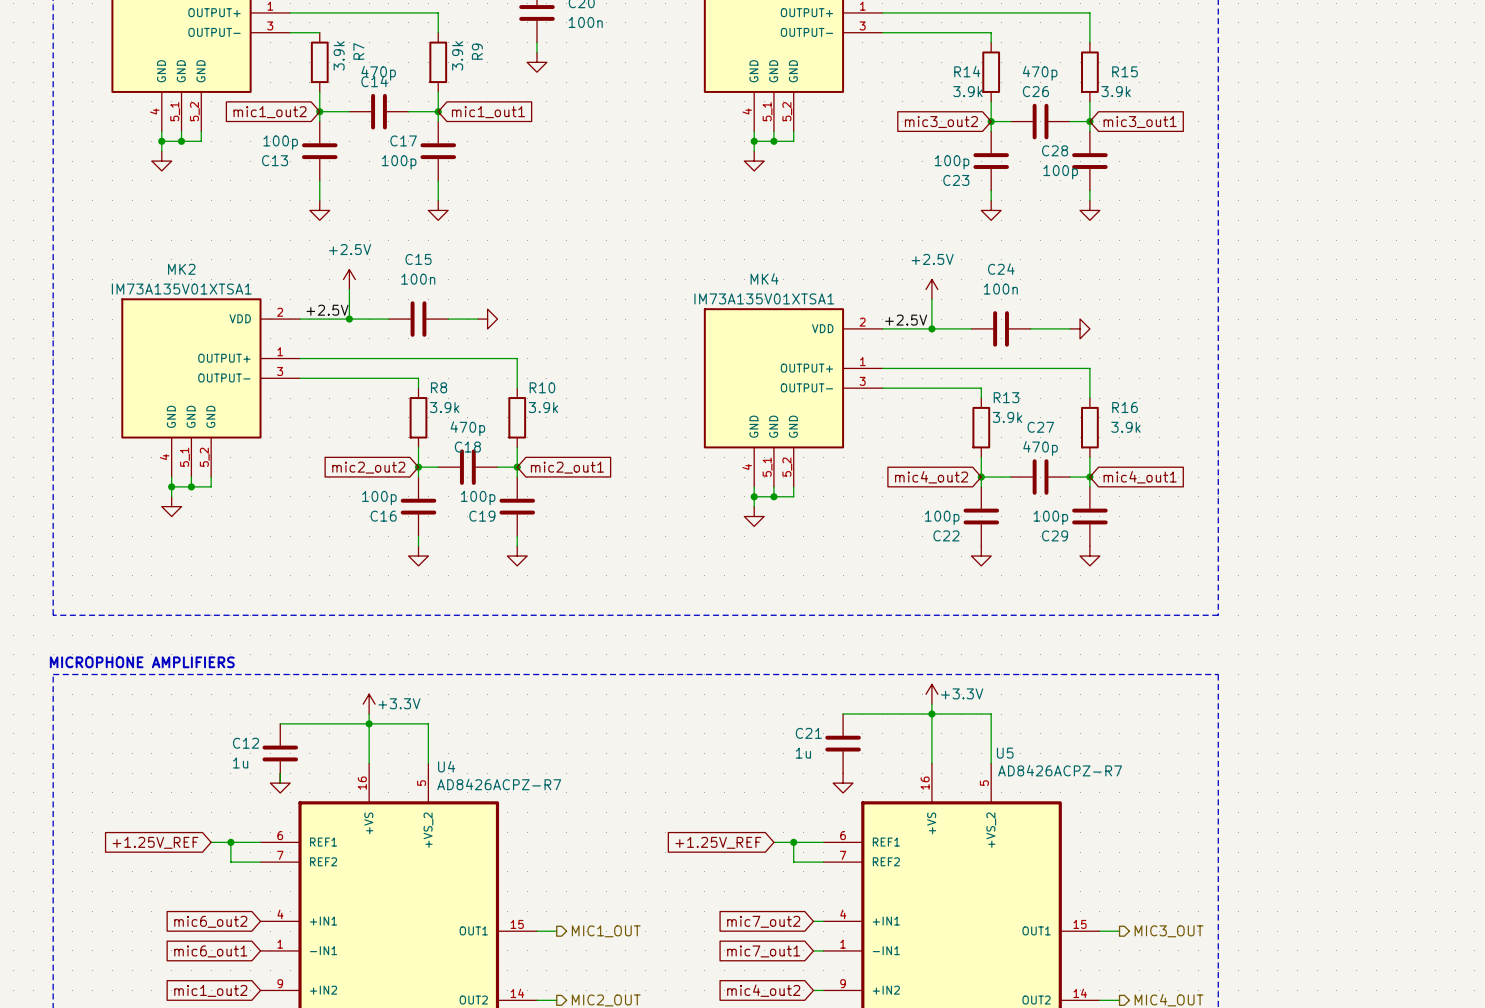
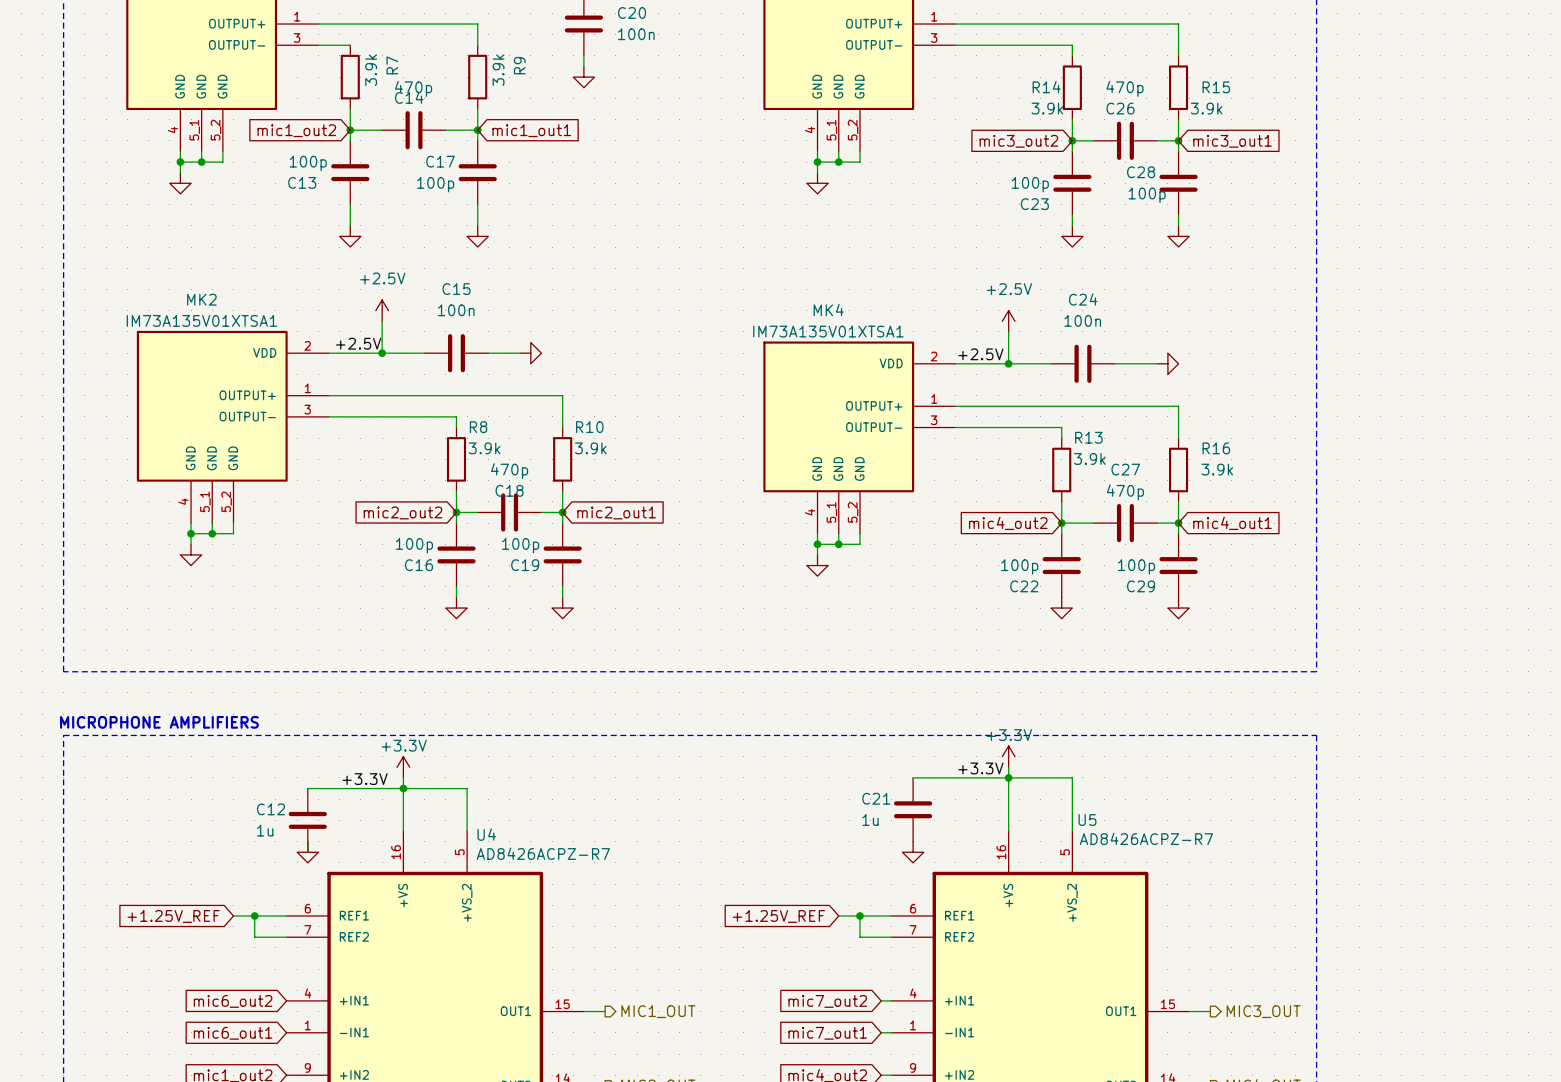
power symbol text position: +3.3V (962, 693) -> +3.3V (1009, 735)
power symbol text position: +3.3V (399, 703) -> +3.3V (404, 745)
label: none -> +3.3V (980, 768)
label: none -> +3.3V (365, 779)

